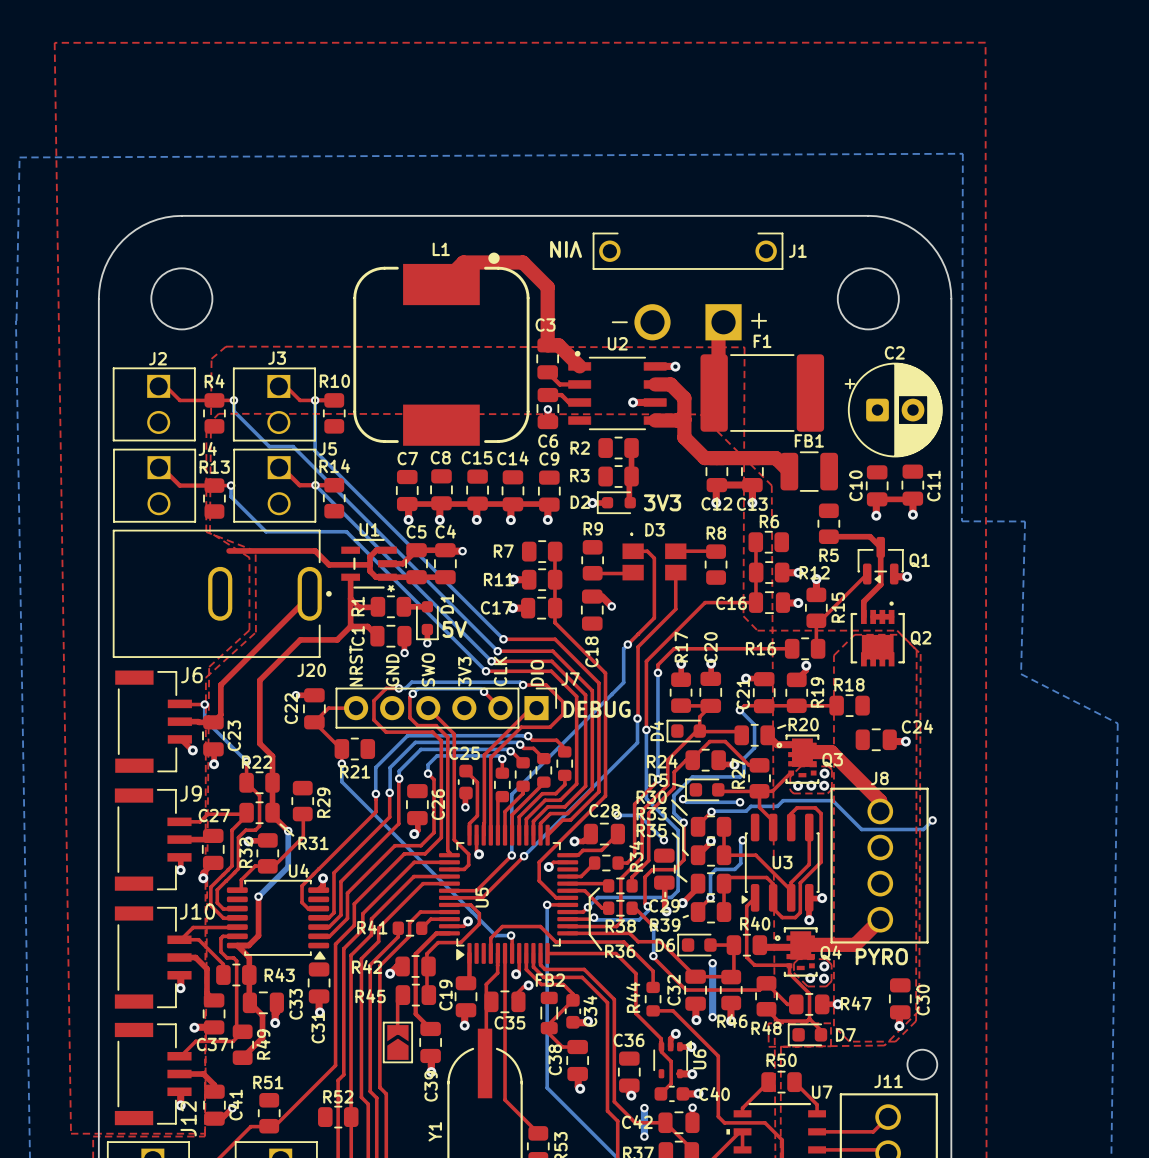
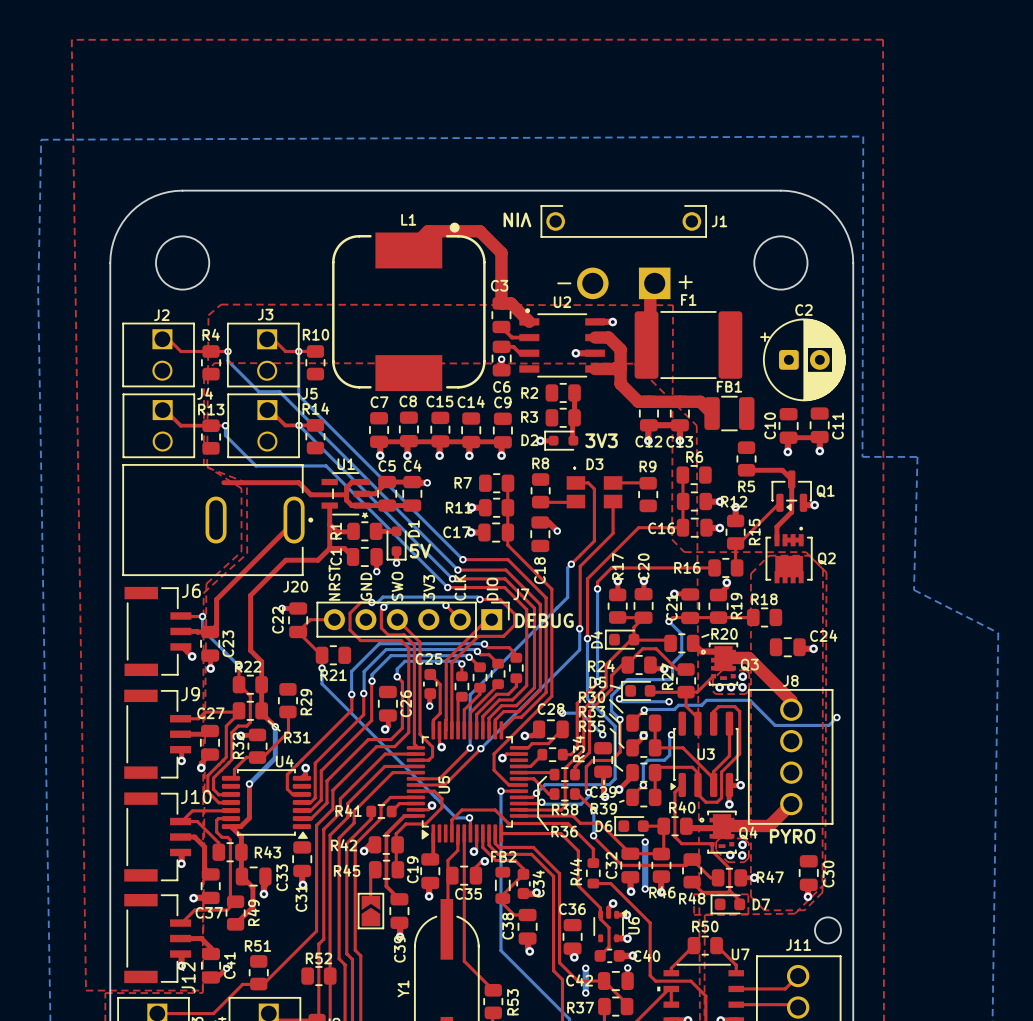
R9 name: R9 (593, 528) -> R8 (540, 463)
R8 name: R8 (716, 533) -> R9 (648, 466)

